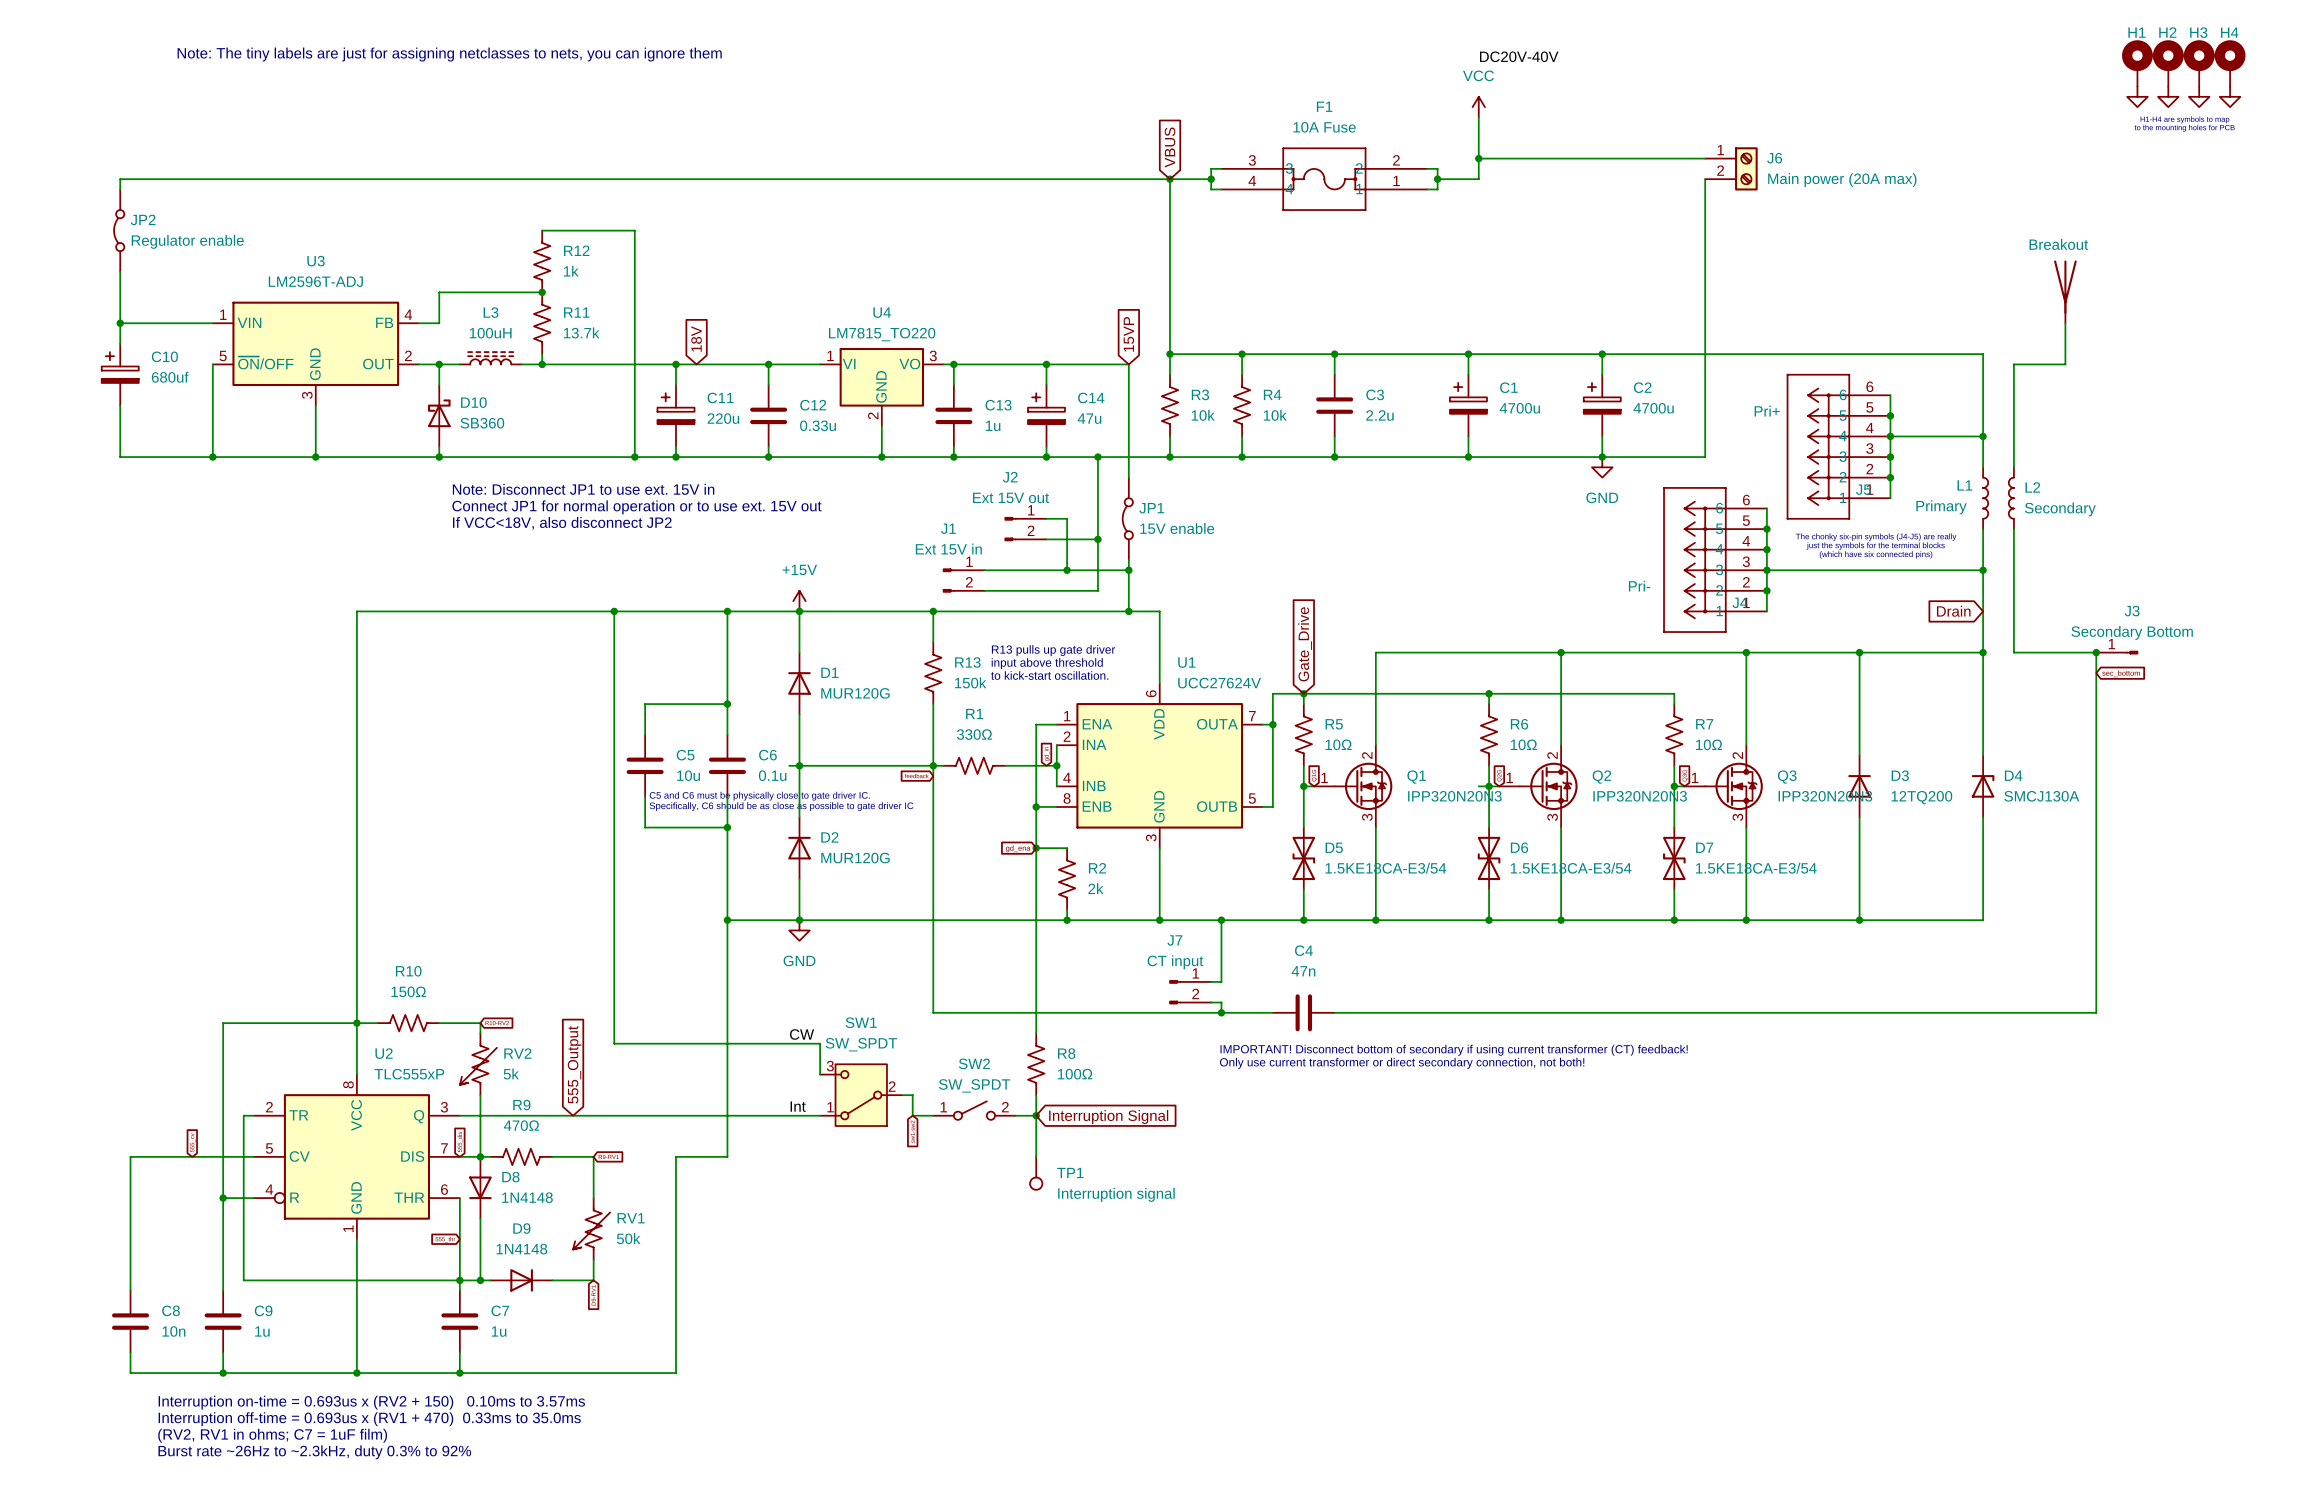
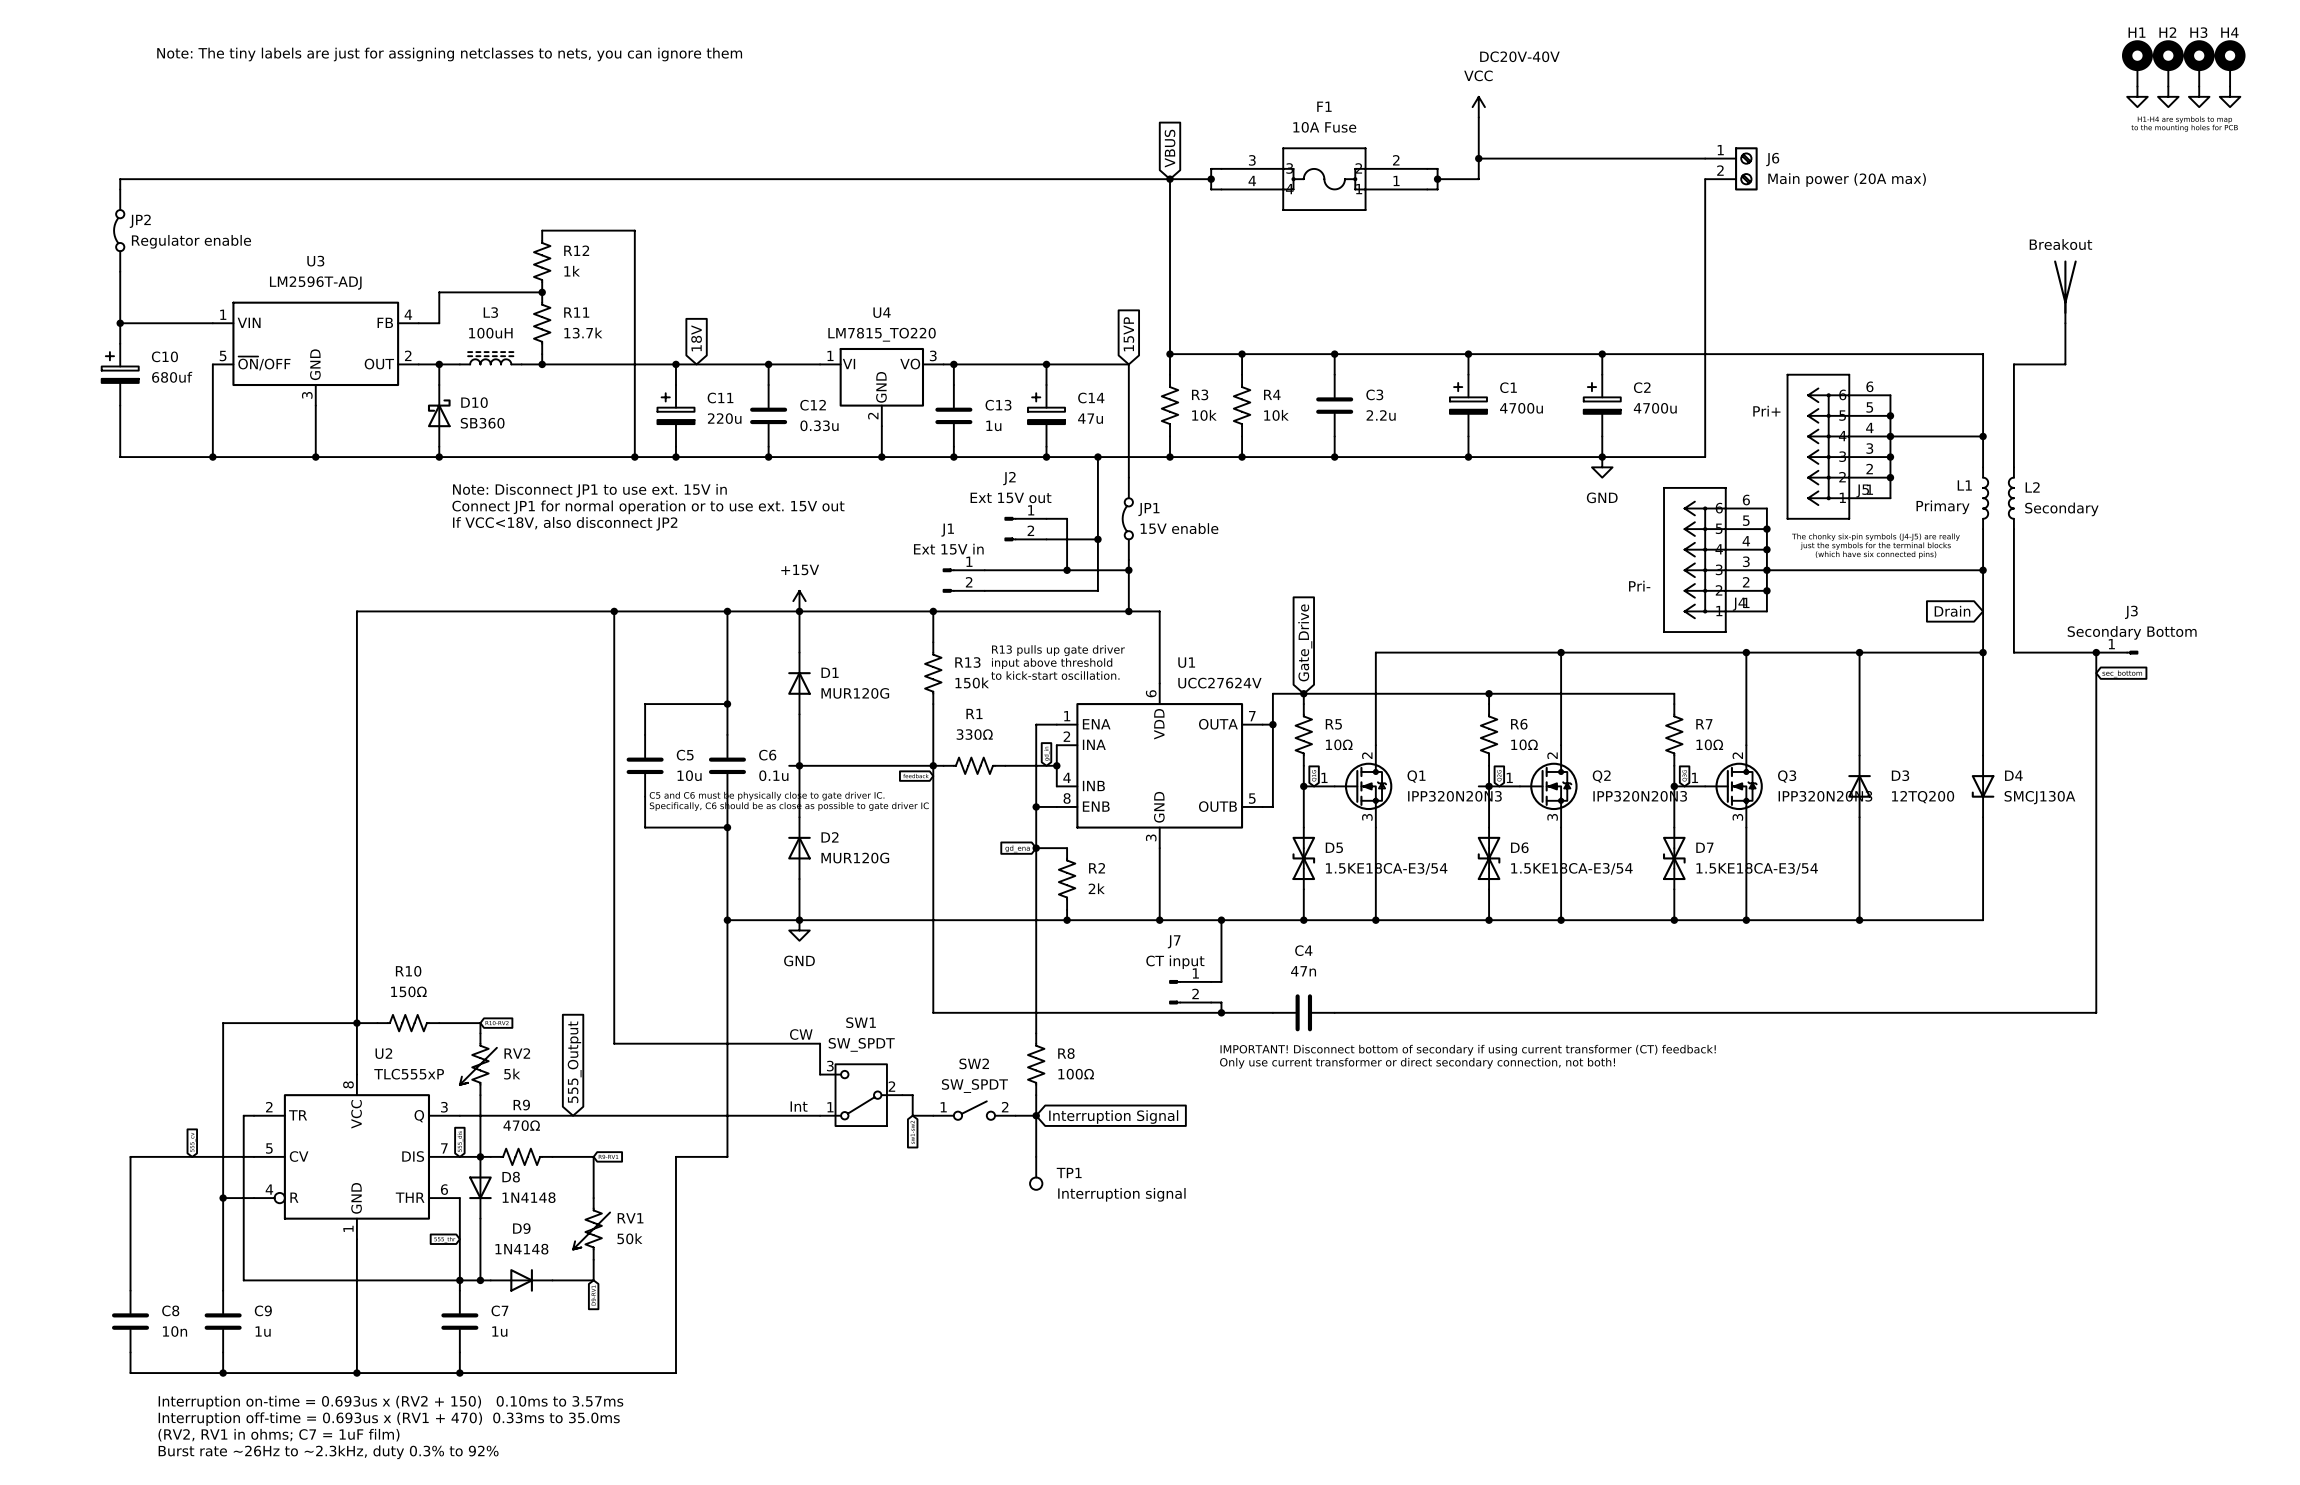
D4 rotation: 0° (1983, 786) -> 180° (1983, 786)

